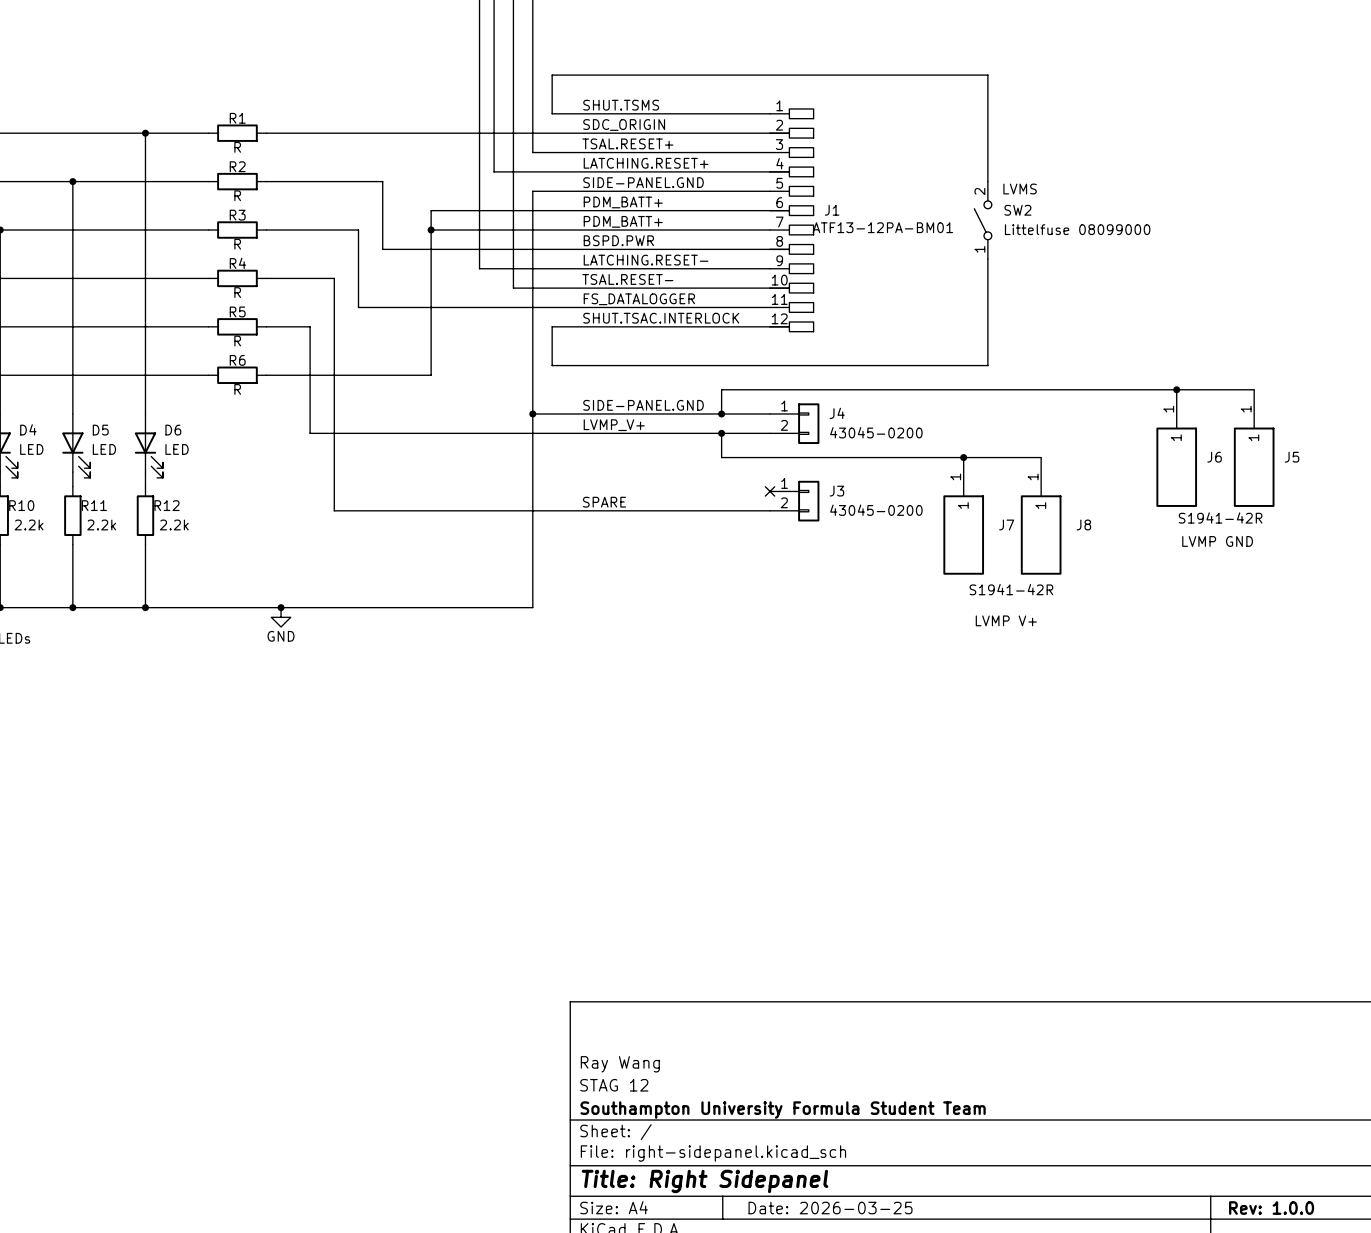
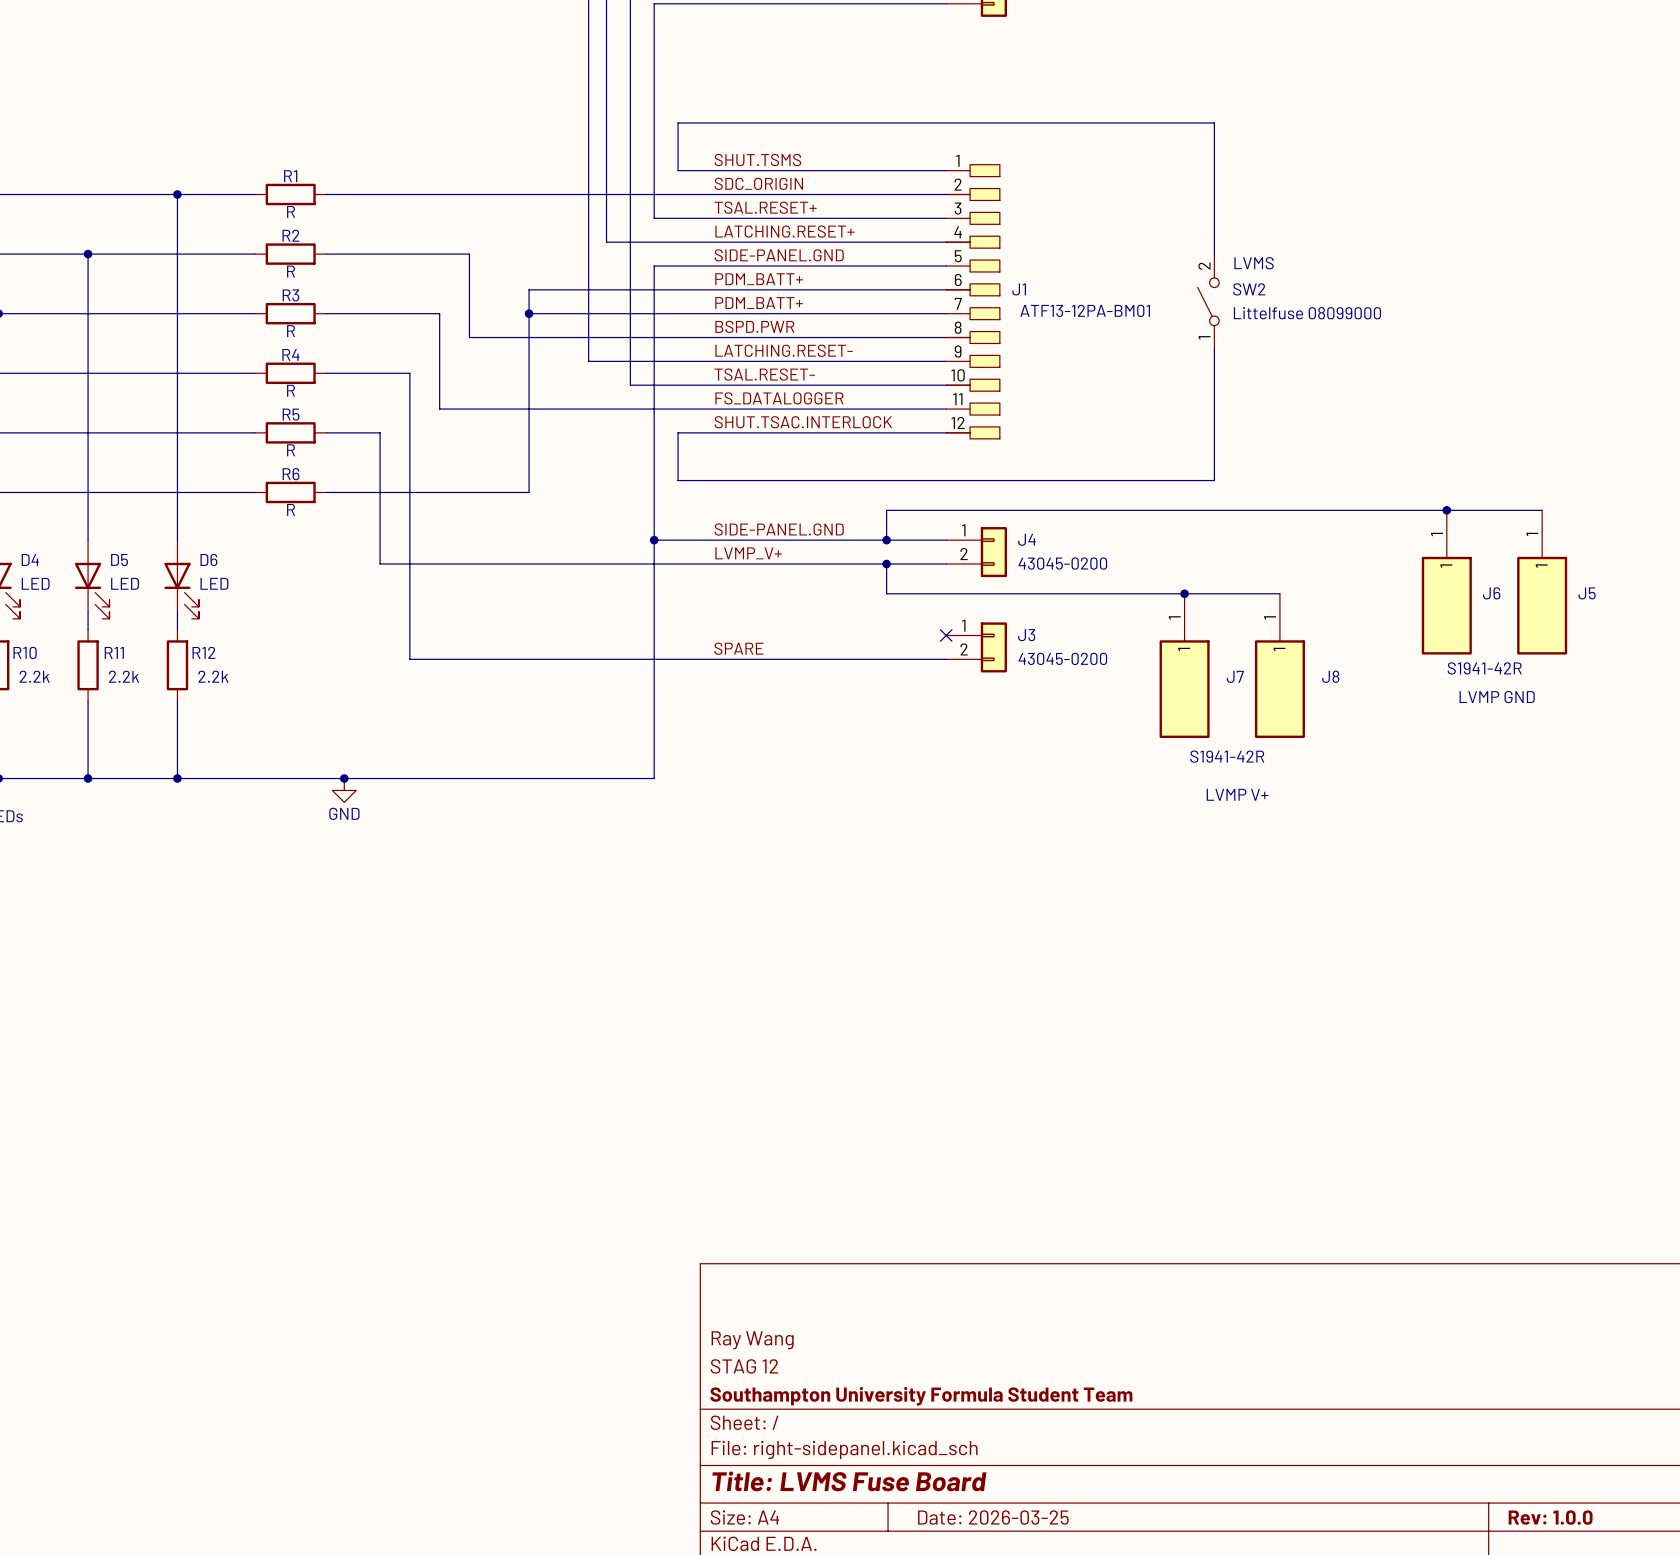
title block: Title: Right Sidepanel (705, 1181) -> Title: LVMS Fuse Board (849, 1481)

